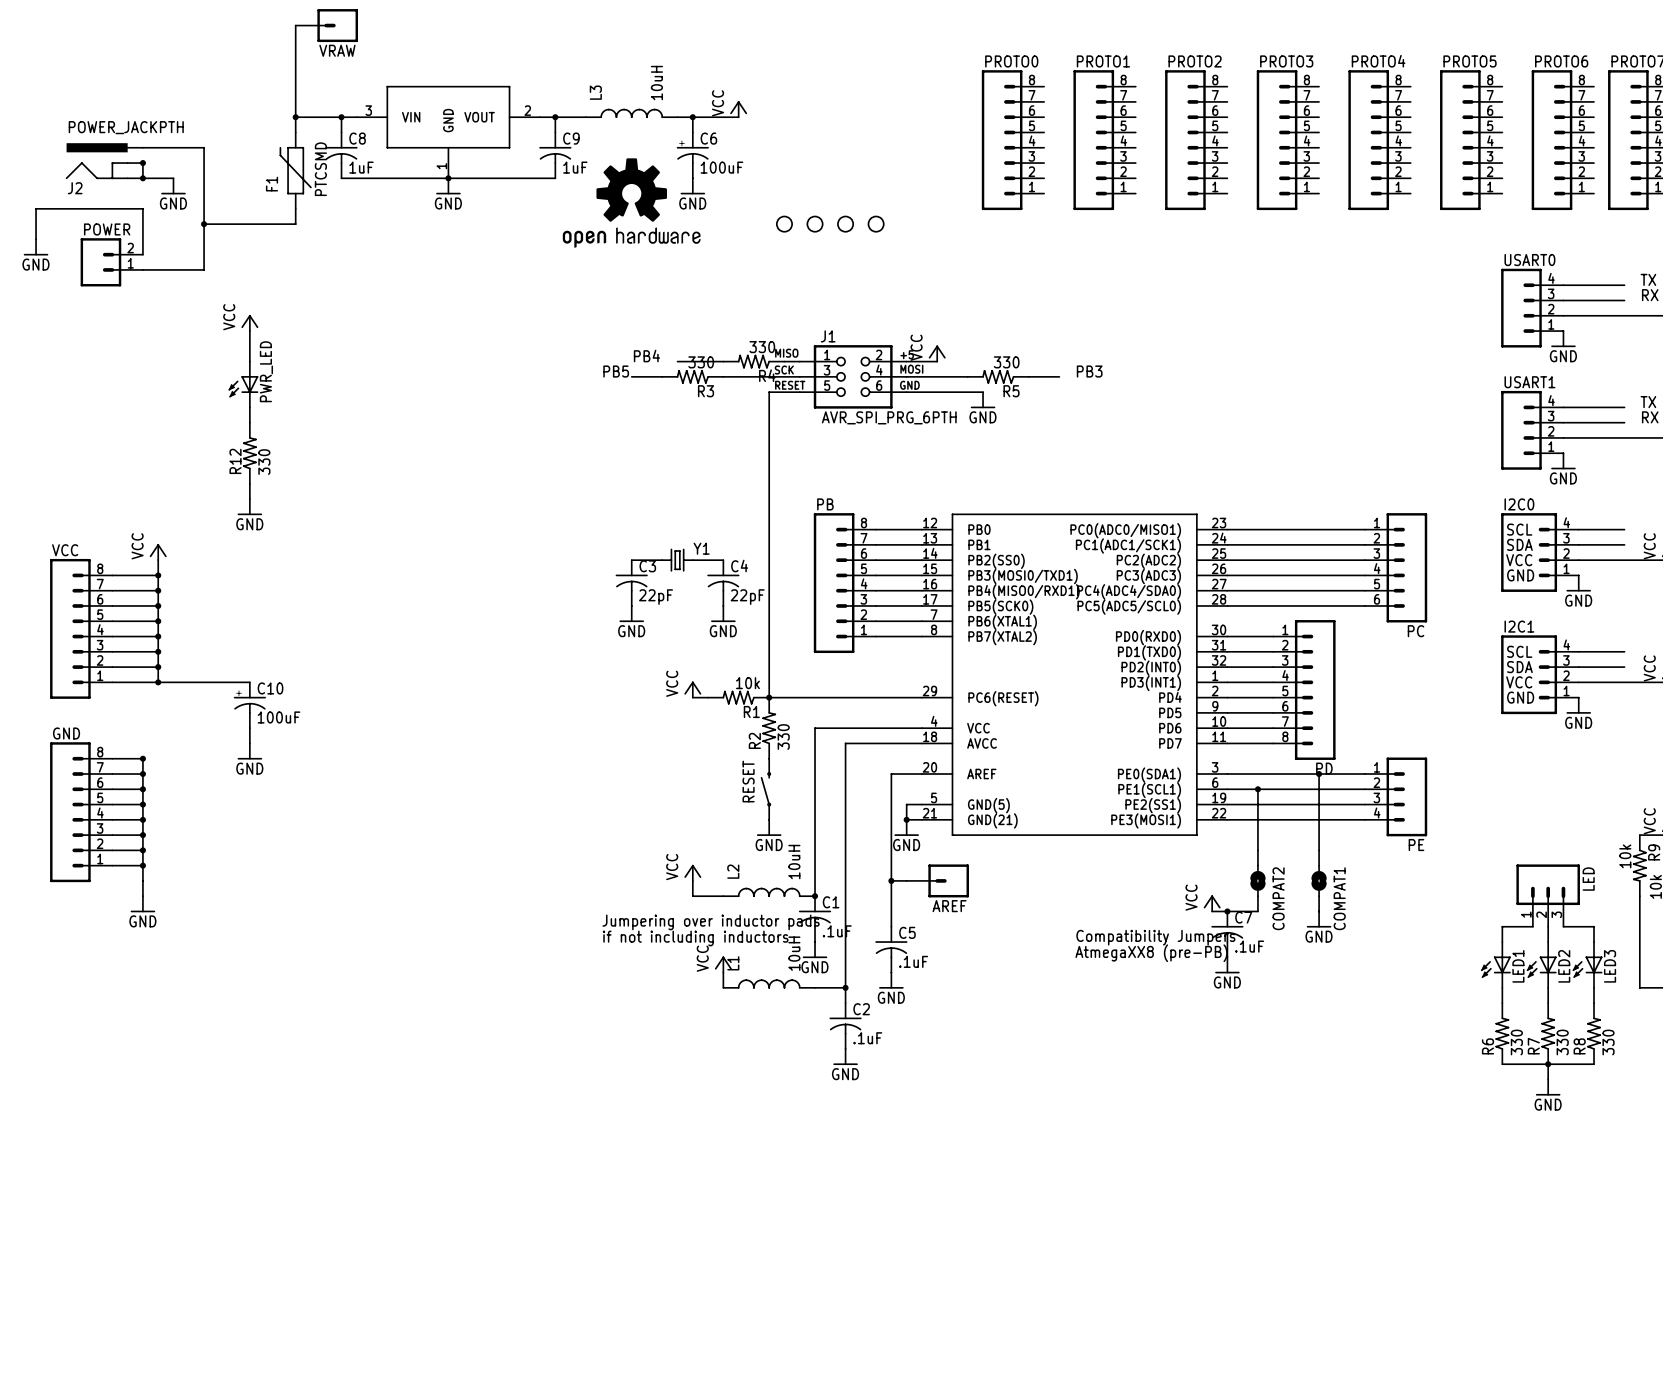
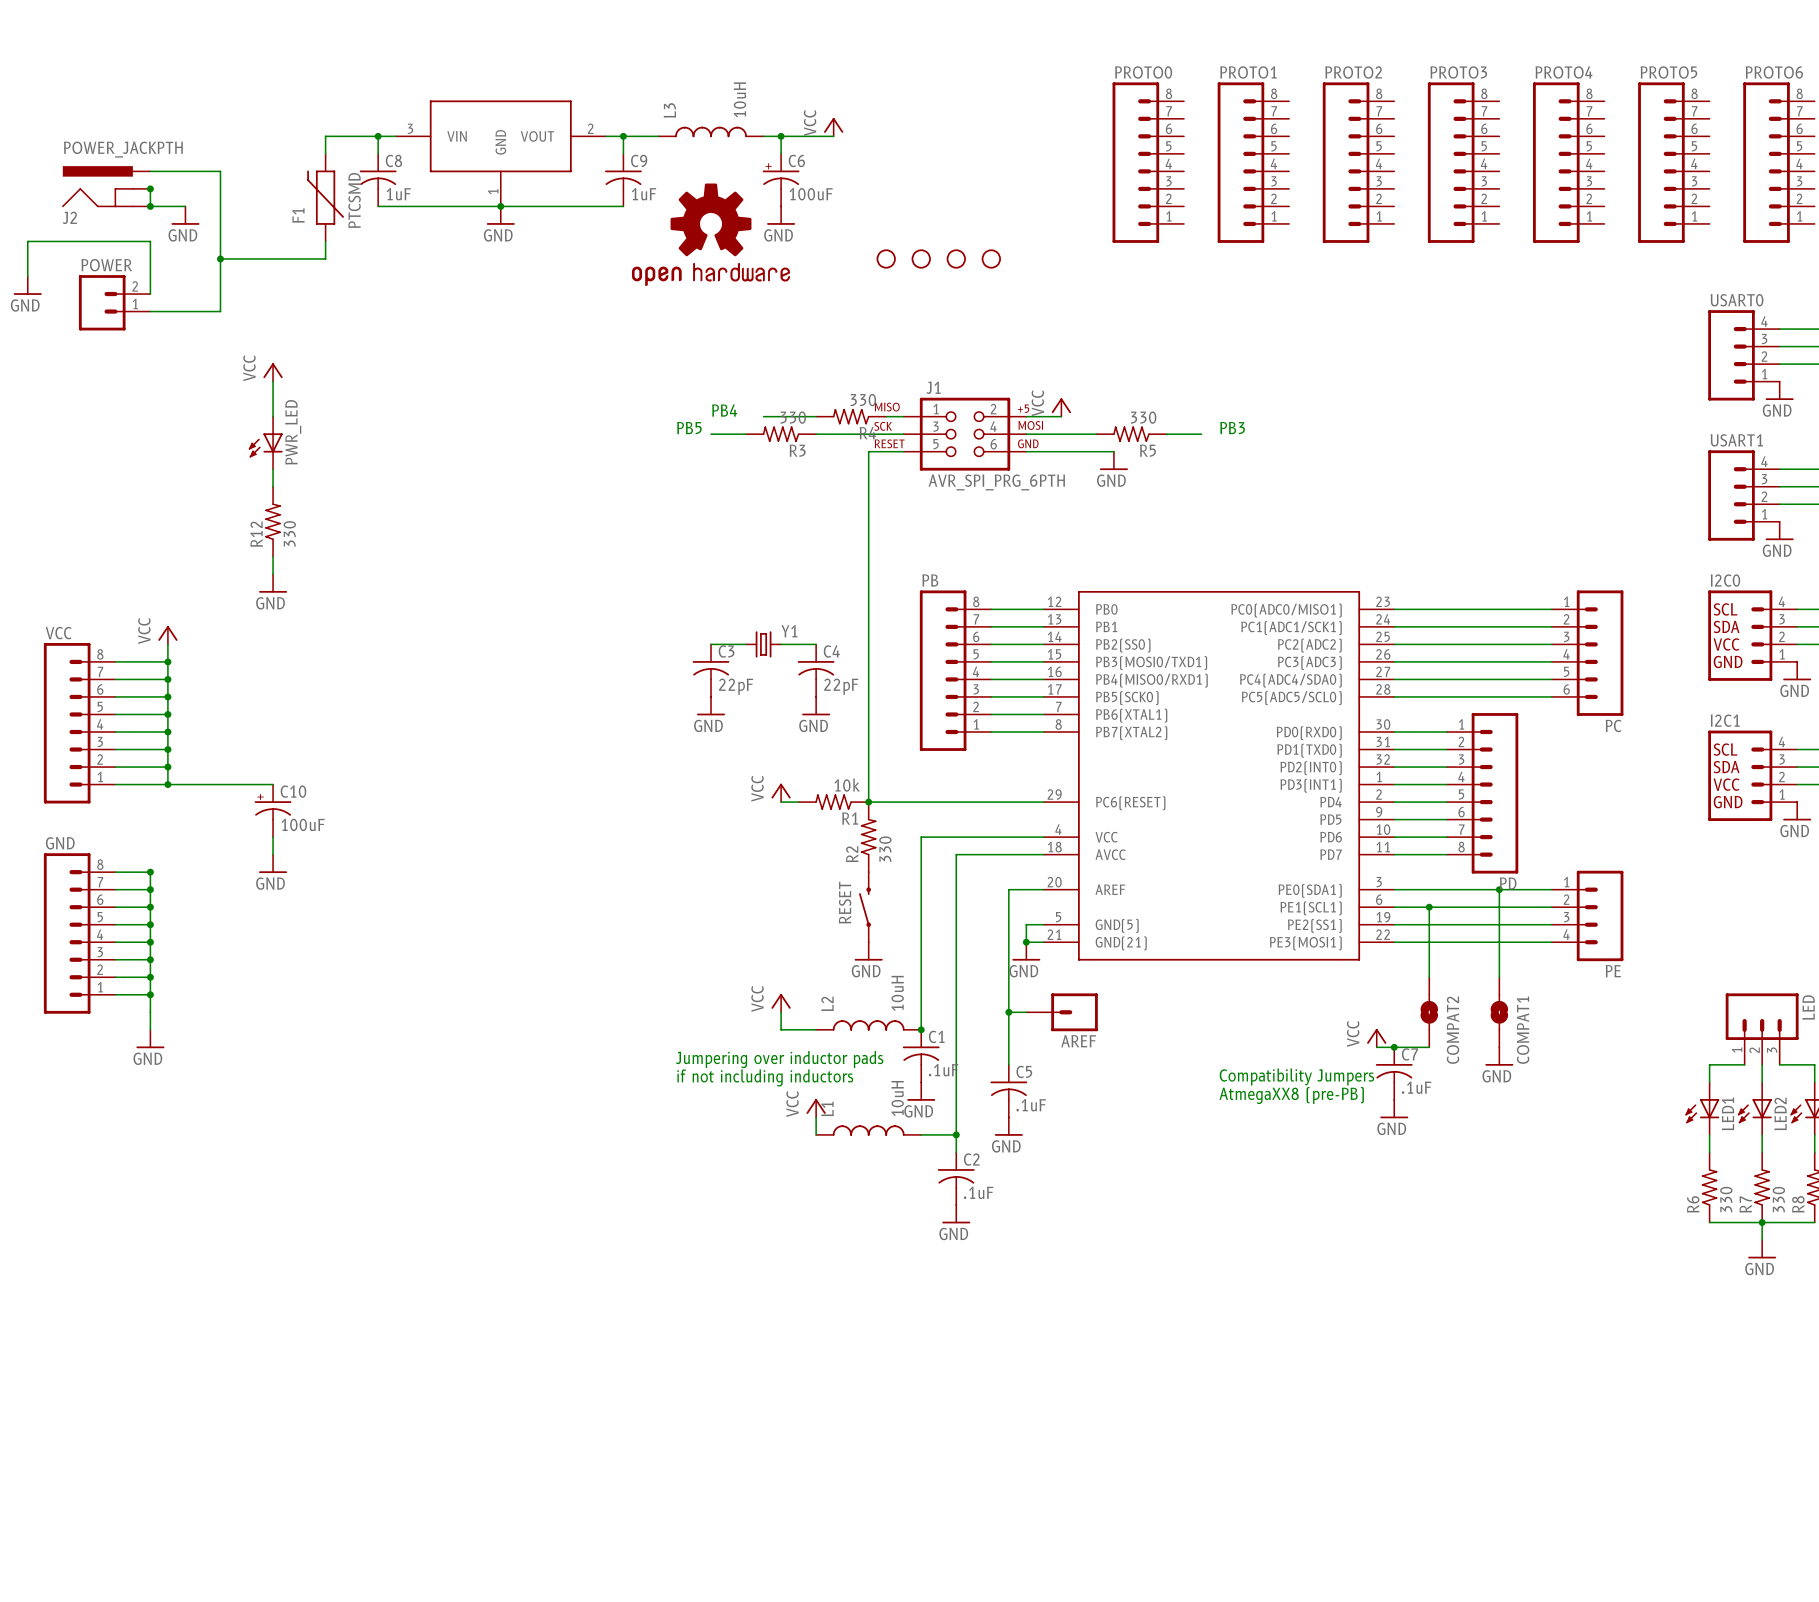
wire: (295, 25) (295, 117) -> none
VRAW: (326, 25) -> none
junction: (295, 117) -> none

